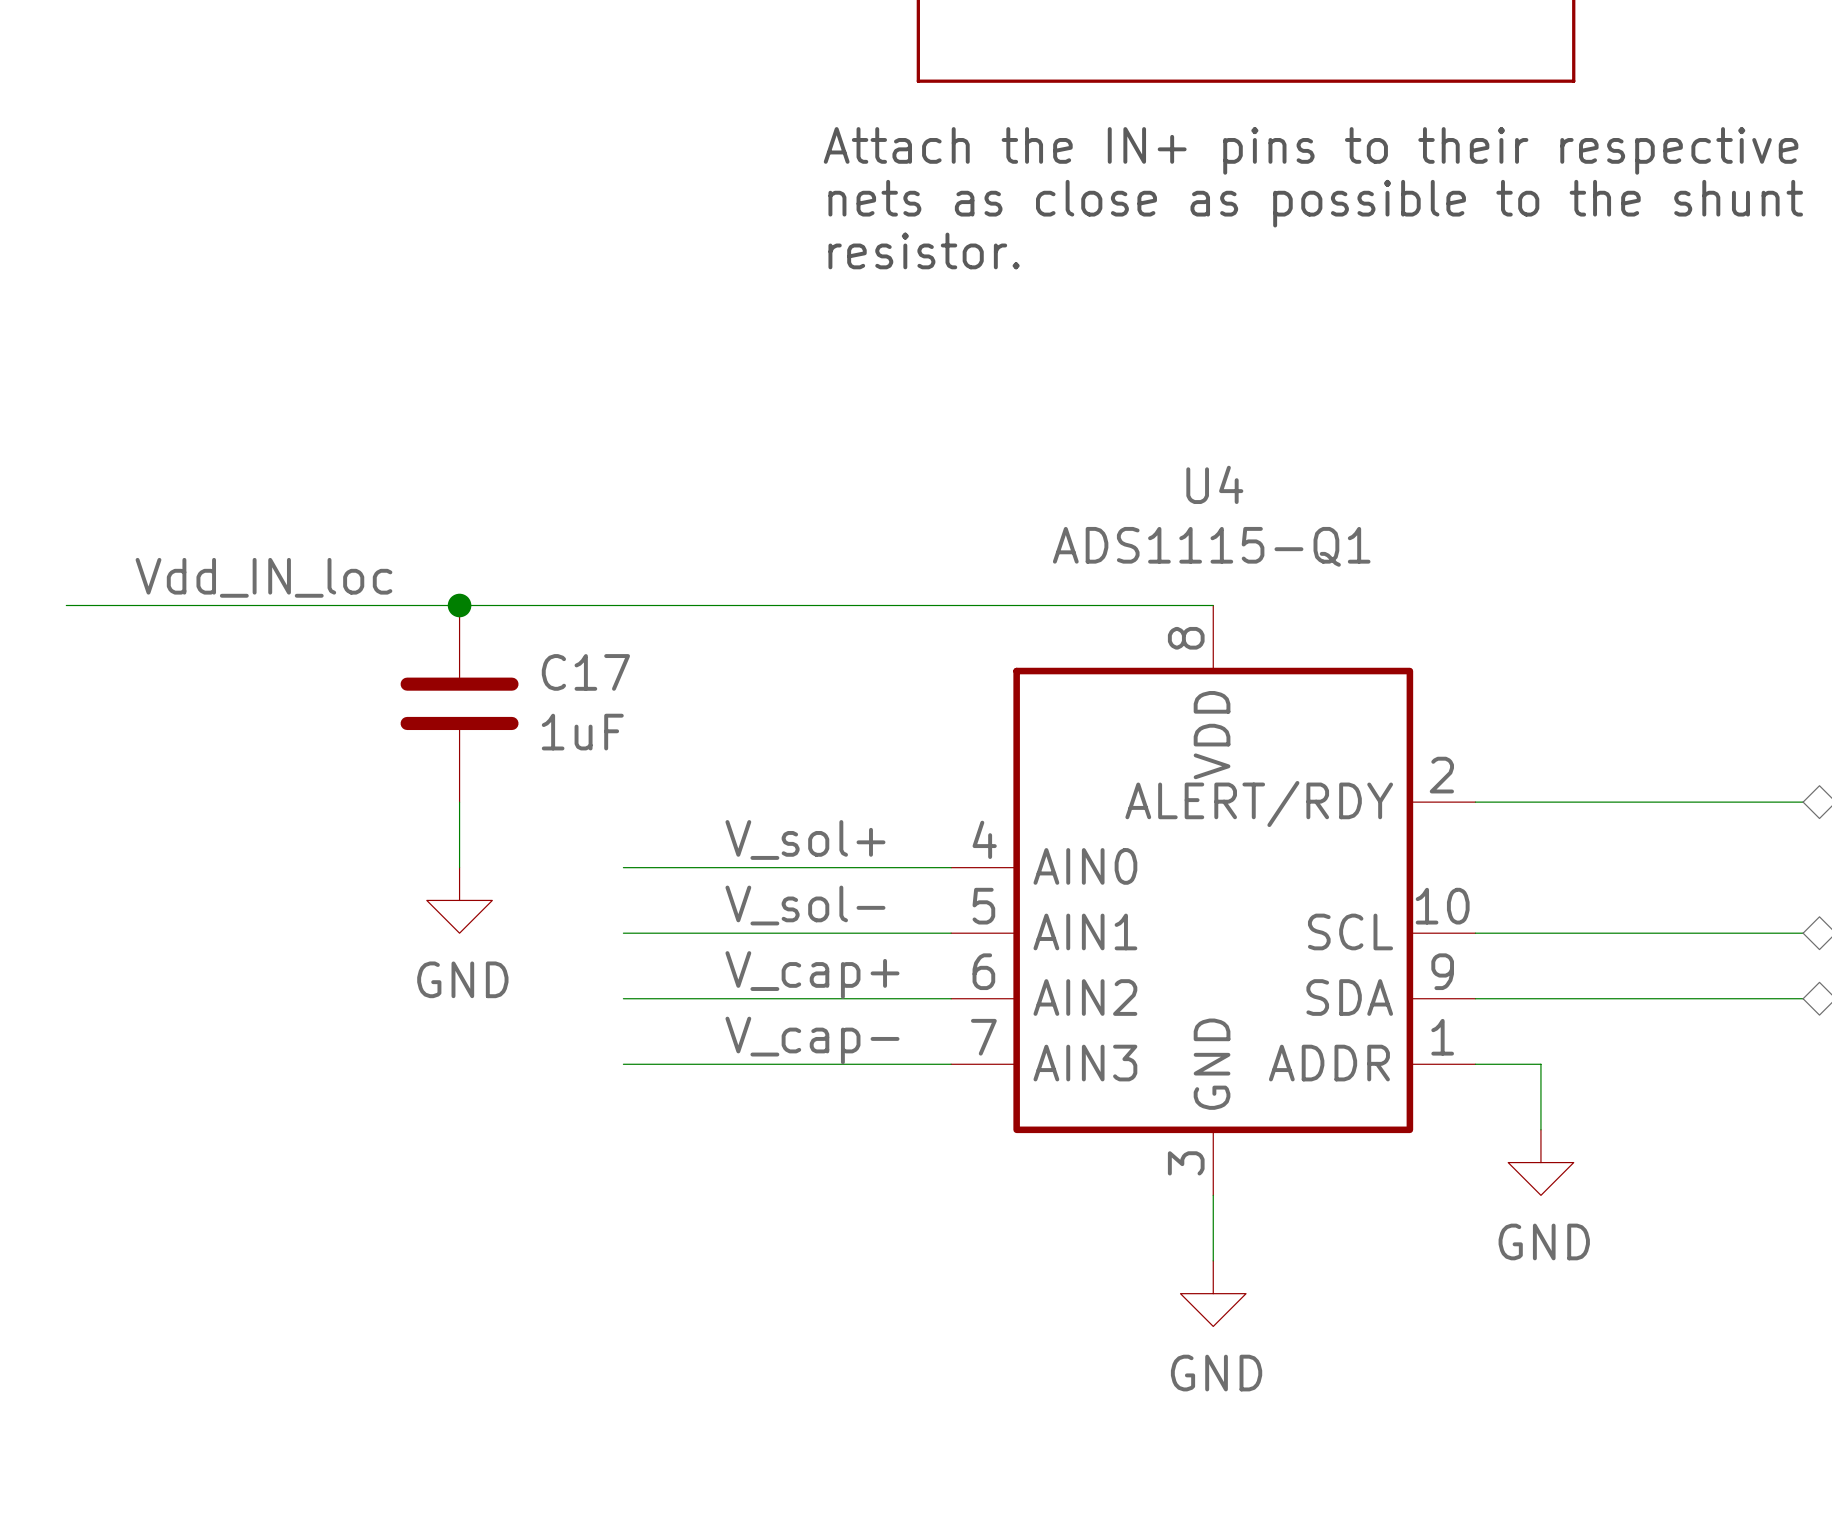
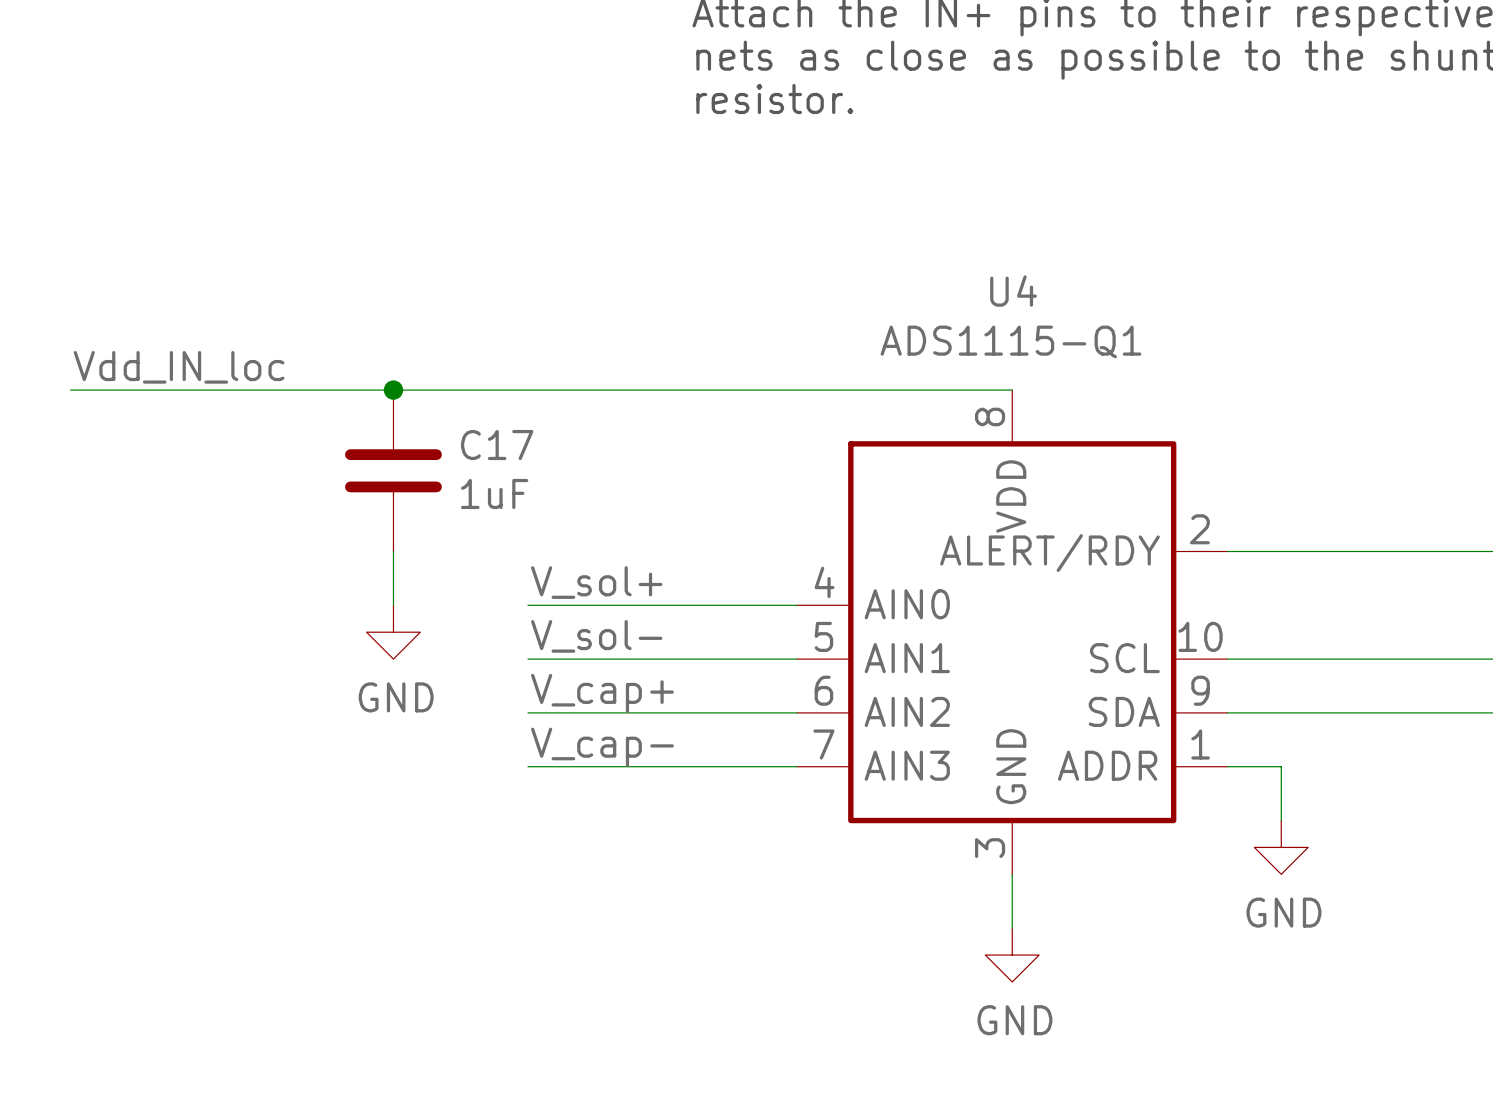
label position: Vdd_IN_loc (263, 577) -> Vdd_IN_loc (179, 367)
label position: V_sol+ (805, 839) -> V_sol+ (596, 582)
label position: V_sol- (805, 905) -> V_sol- (596, 636)
label position: V_cap+ (812, 974) -> V_cap+ (602, 693)
label position: V_cap- (812, 1040) -> V_cap- (602, 747)

